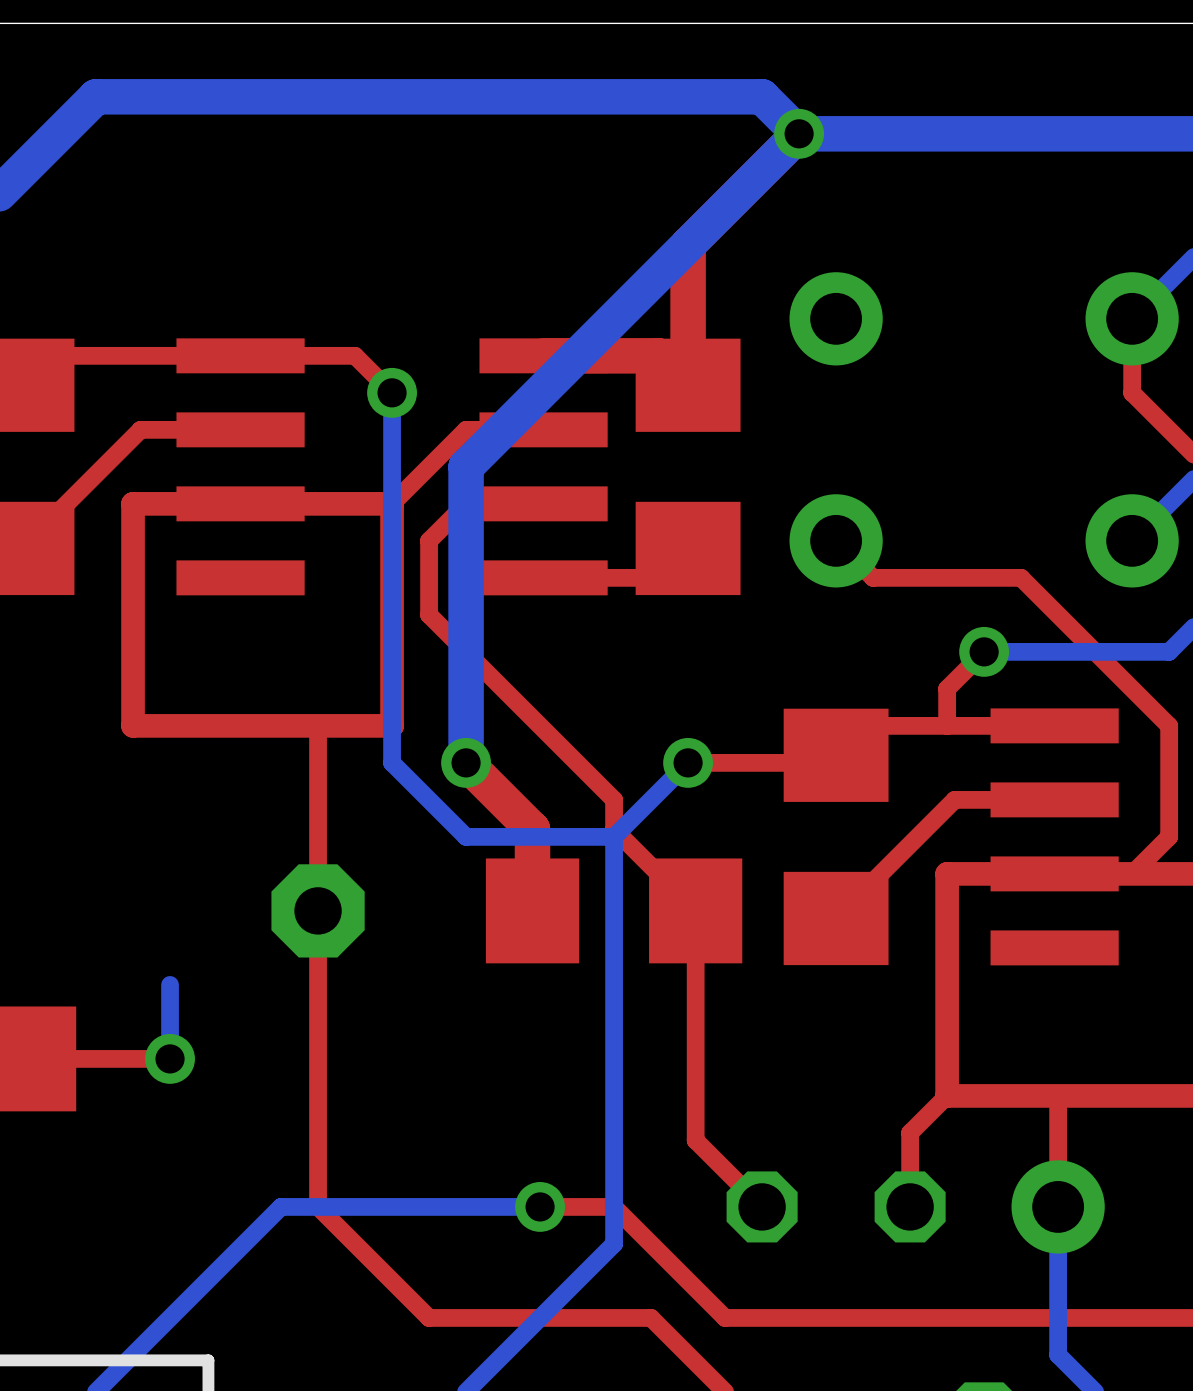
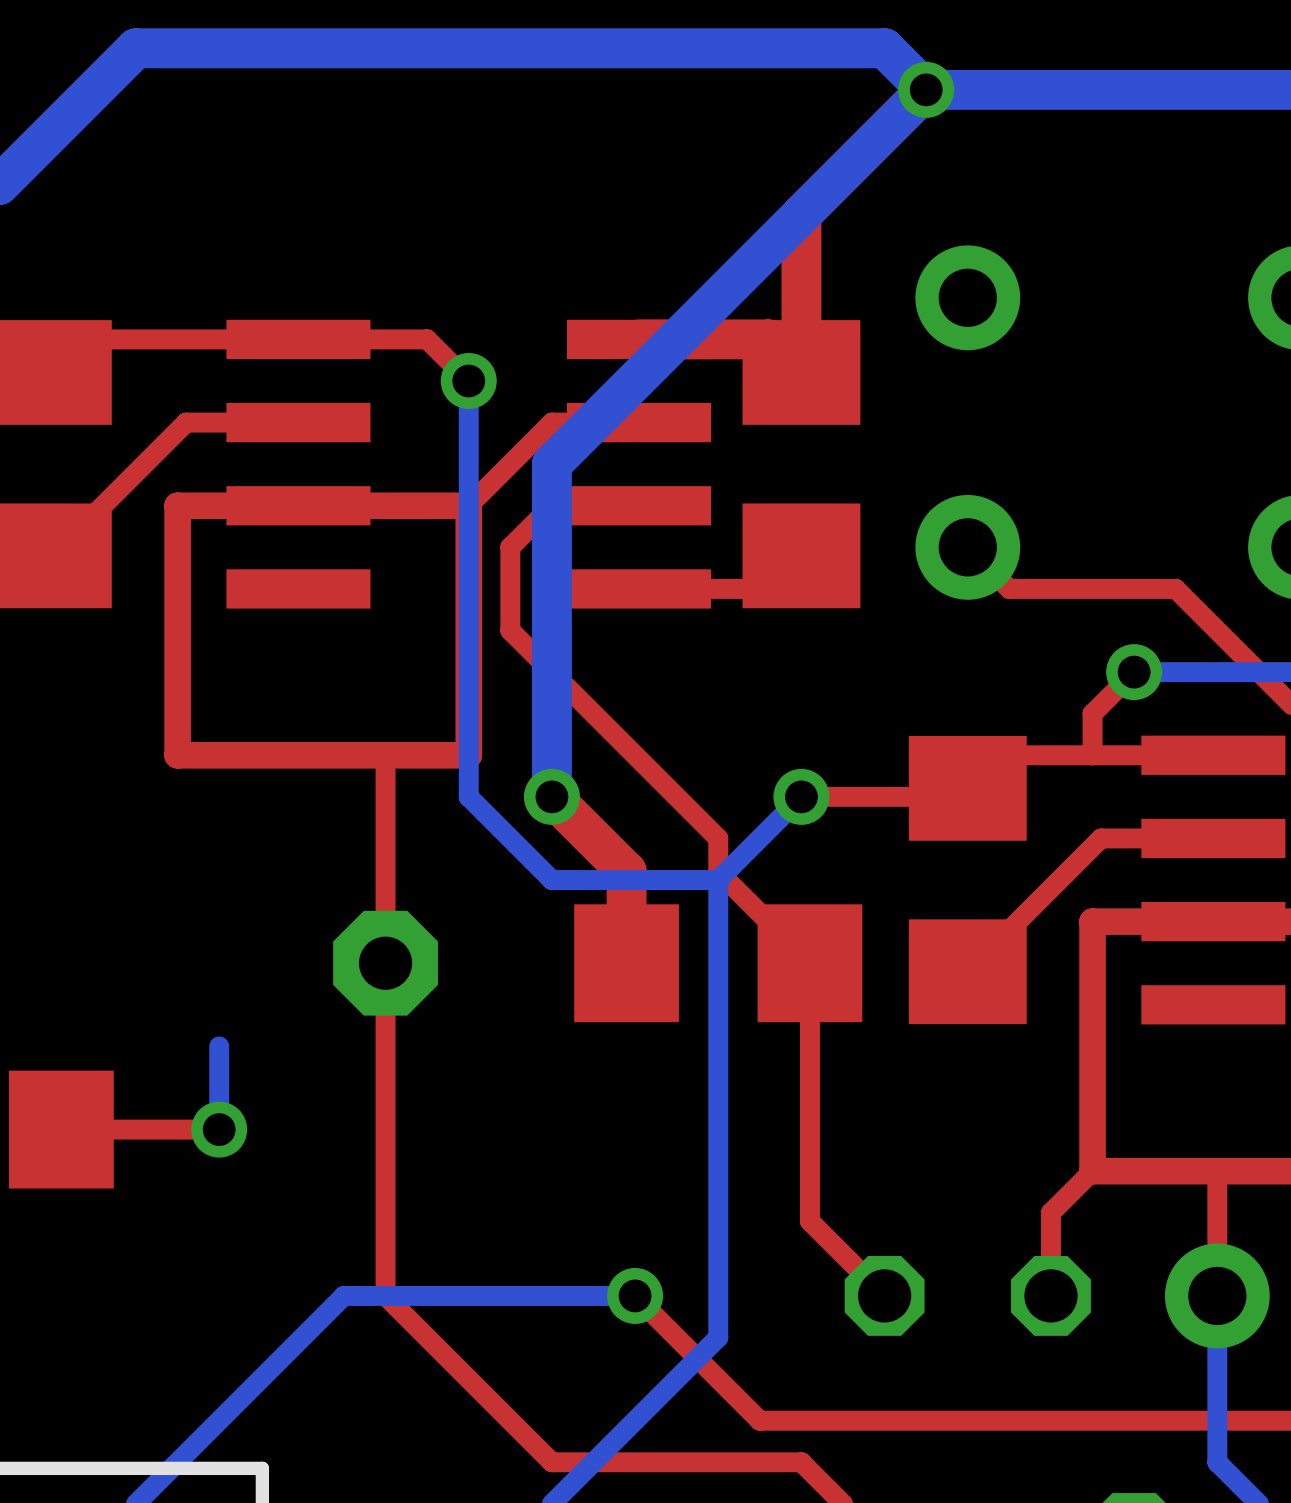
top track: (540, 1206) (614, 1206) (725, 1317) -> (635, 1295) (759, 1420) (843, 1420)
top track: (429, 1317) (651, 1317) (688, 1354) -> (510, 1420) (551, 1462) (801, 1462)

